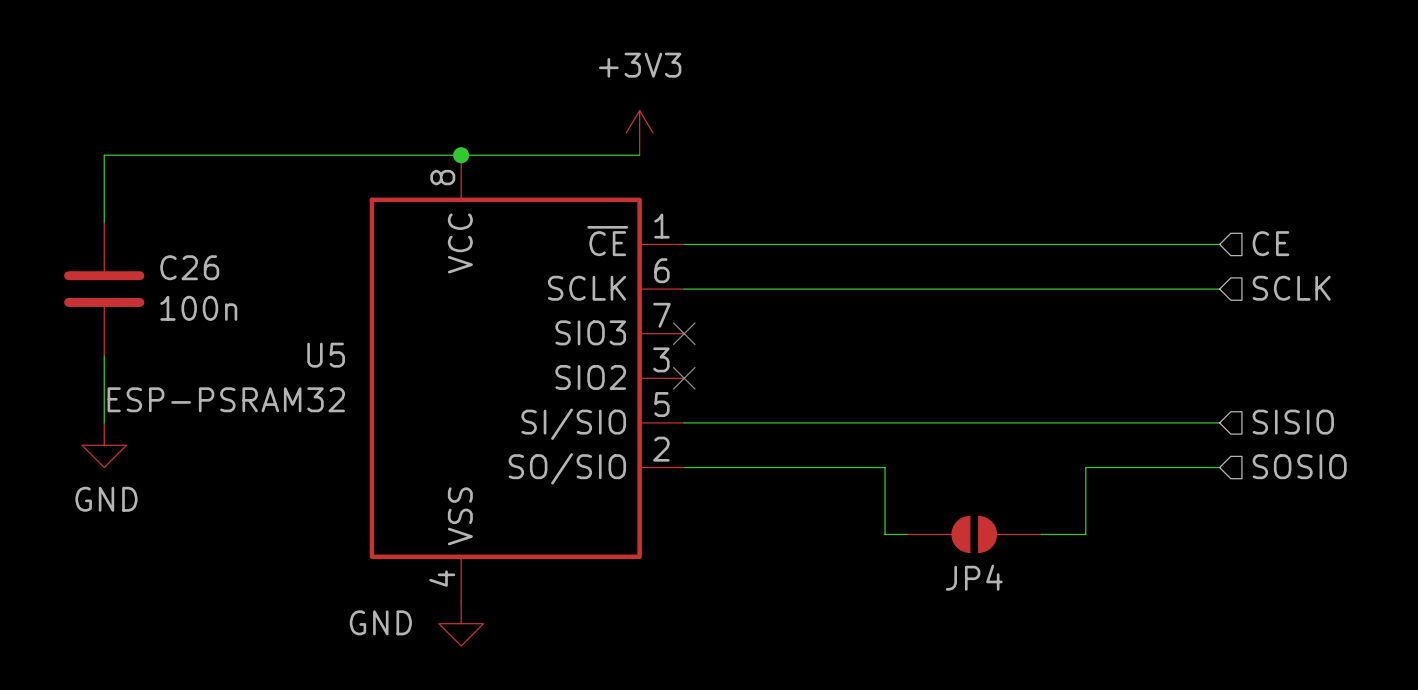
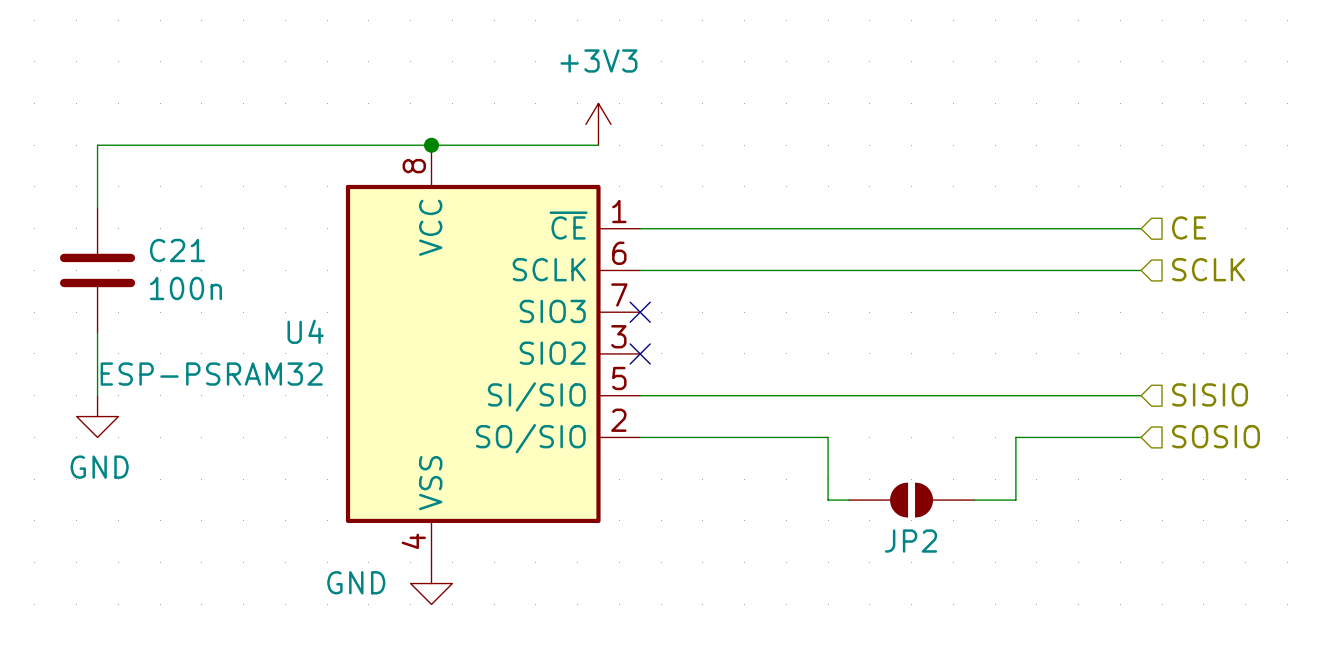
C26 name: C26 (189, 267) -> C21 (177, 250)
U5 name: U5 (326, 355) -> U4 (305, 331)
JP4 name: JP4 (974, 577) -> JP2 (911, 541)

